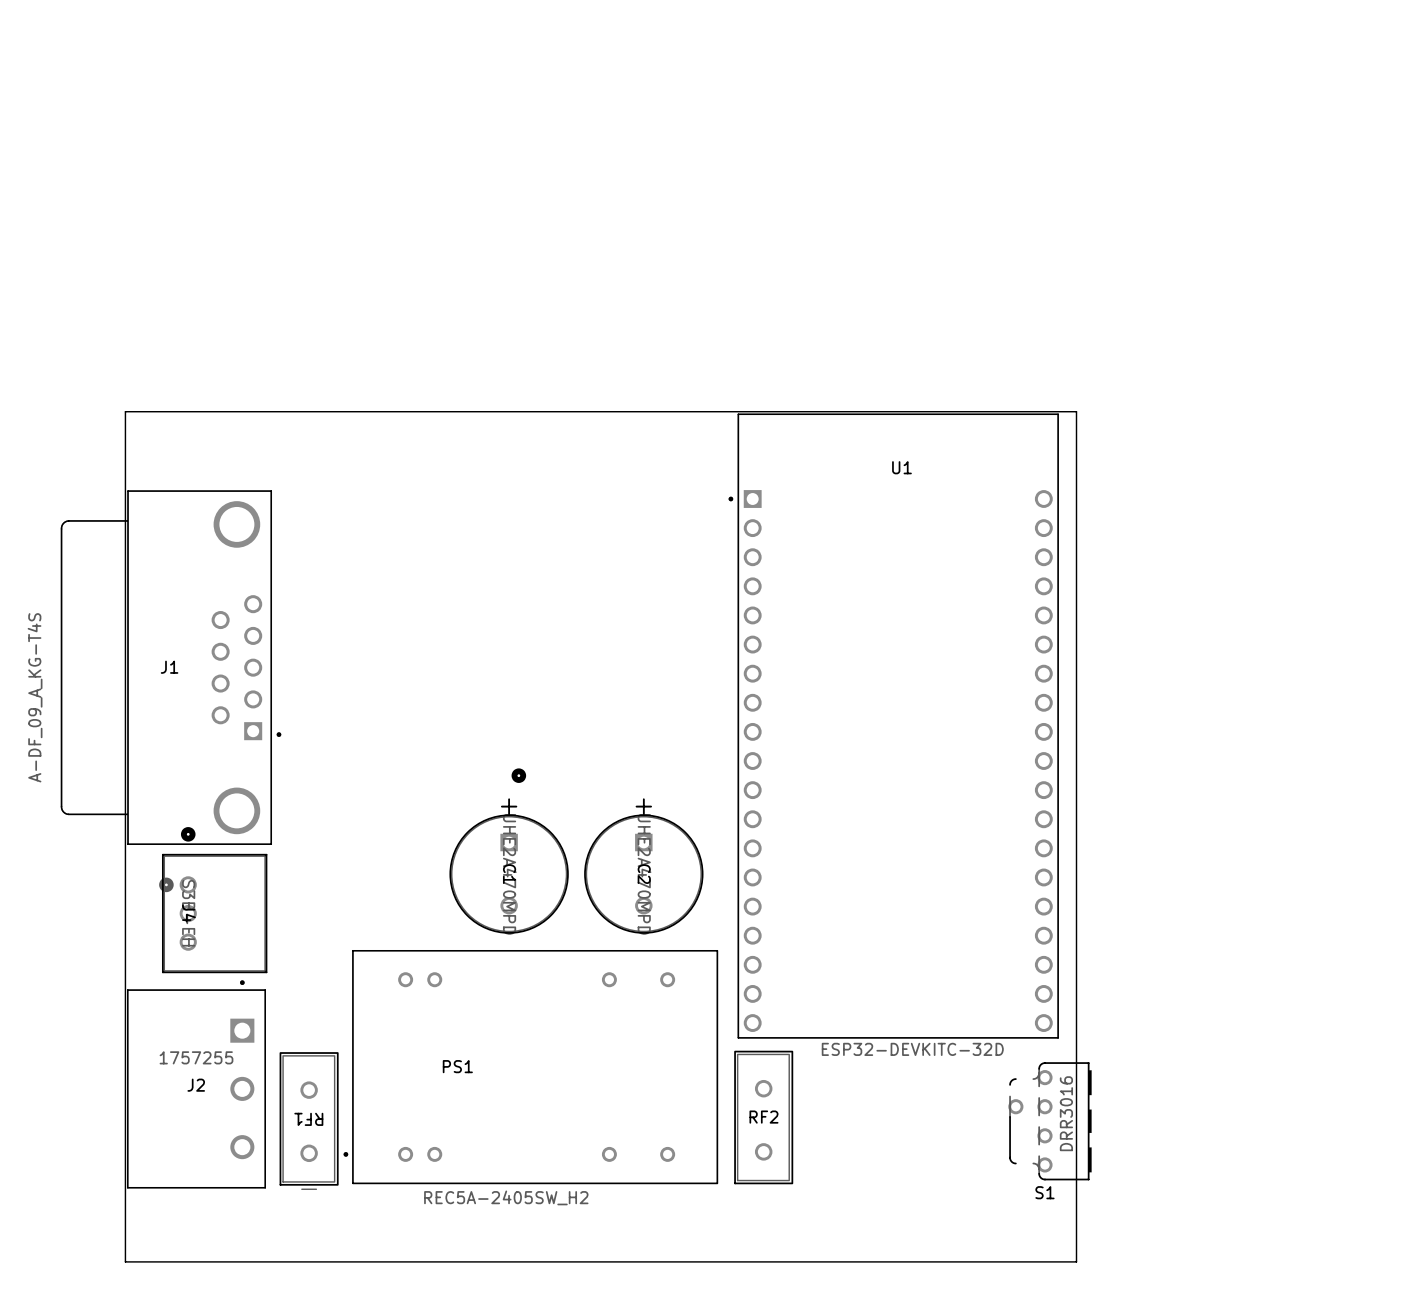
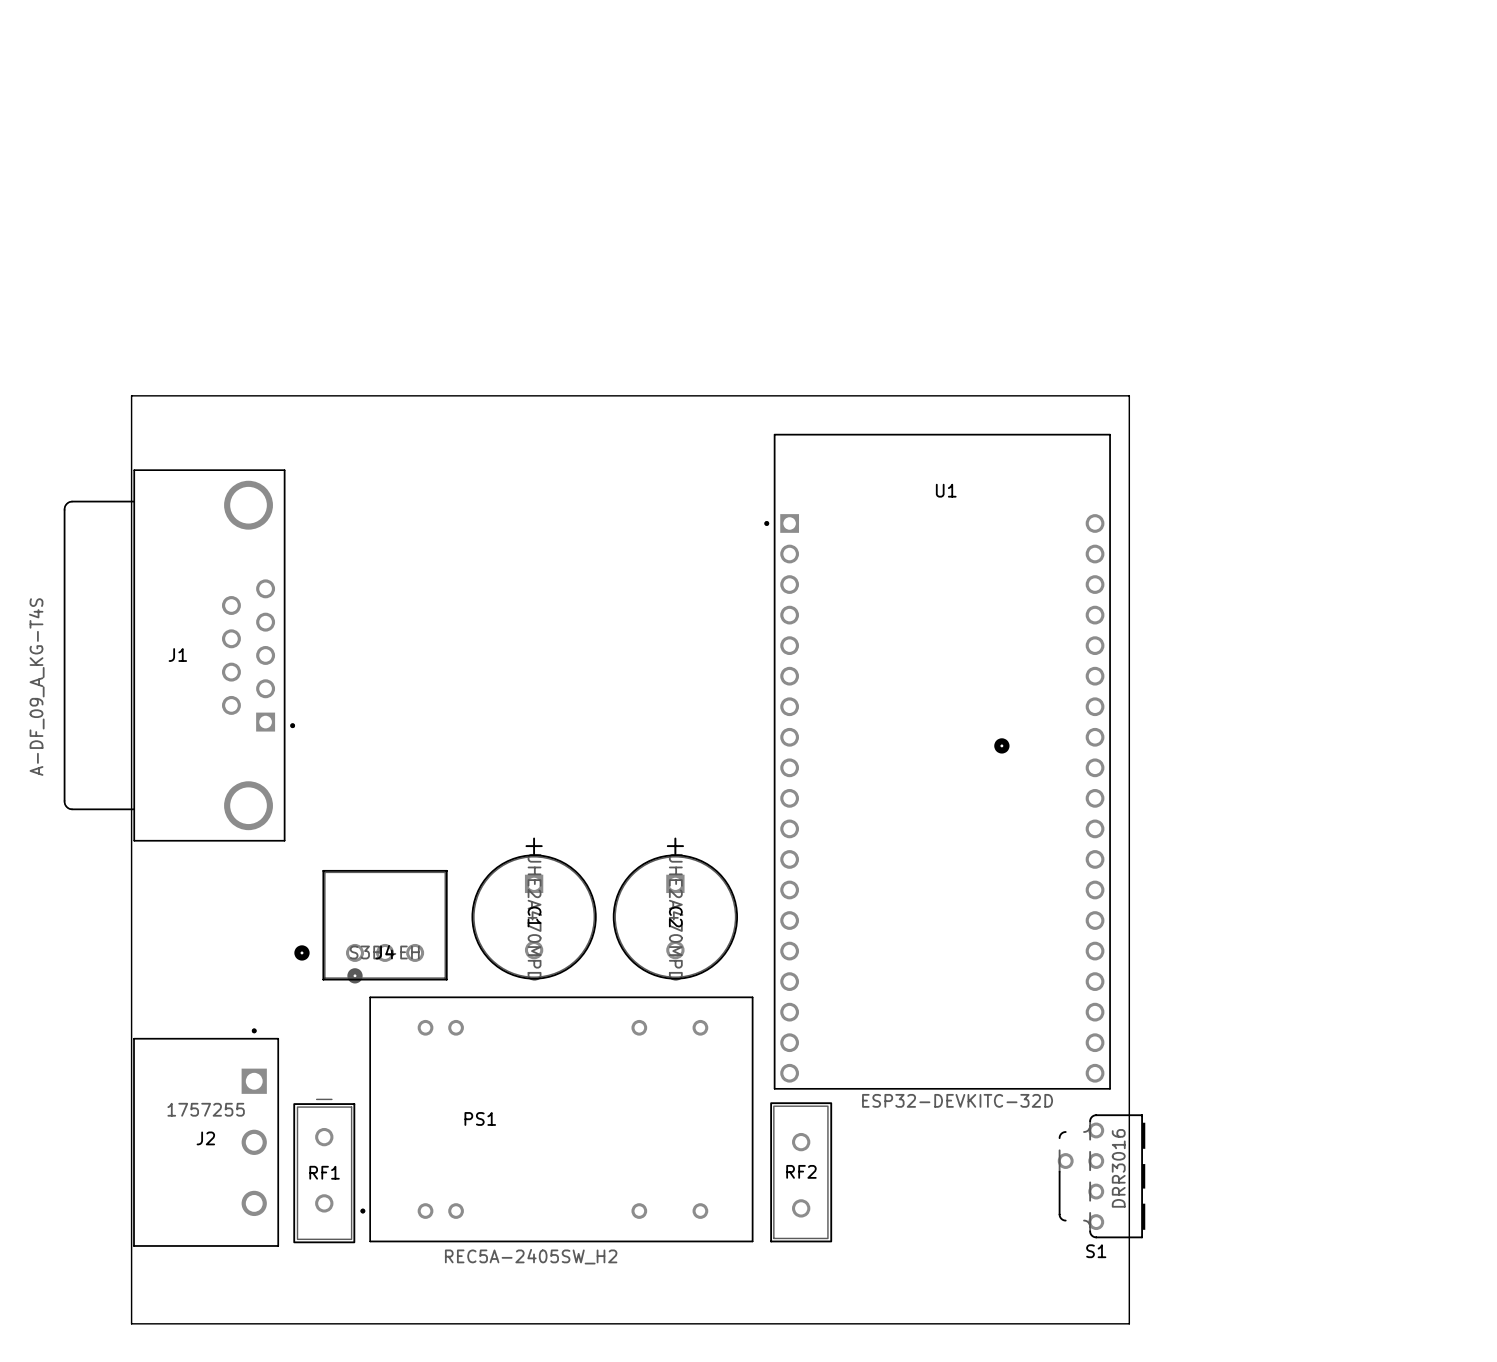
board edge: (125, 411) (1076, 411) -> (131, 431) (131, 395) (1129, 395) (1129, 431)
J1 position: (171, 667) -> (179, 655)
part: none -> (1001, 745)
part: (518, 775) -> none
J4 rotation: 0° (213, 900) -> 90° counterclockwise (371, 926)
J4 position: (213, 900) -> (371, 926)
RF1 rotation: 0° (309, 1120) -> 180° (324, 1171)

